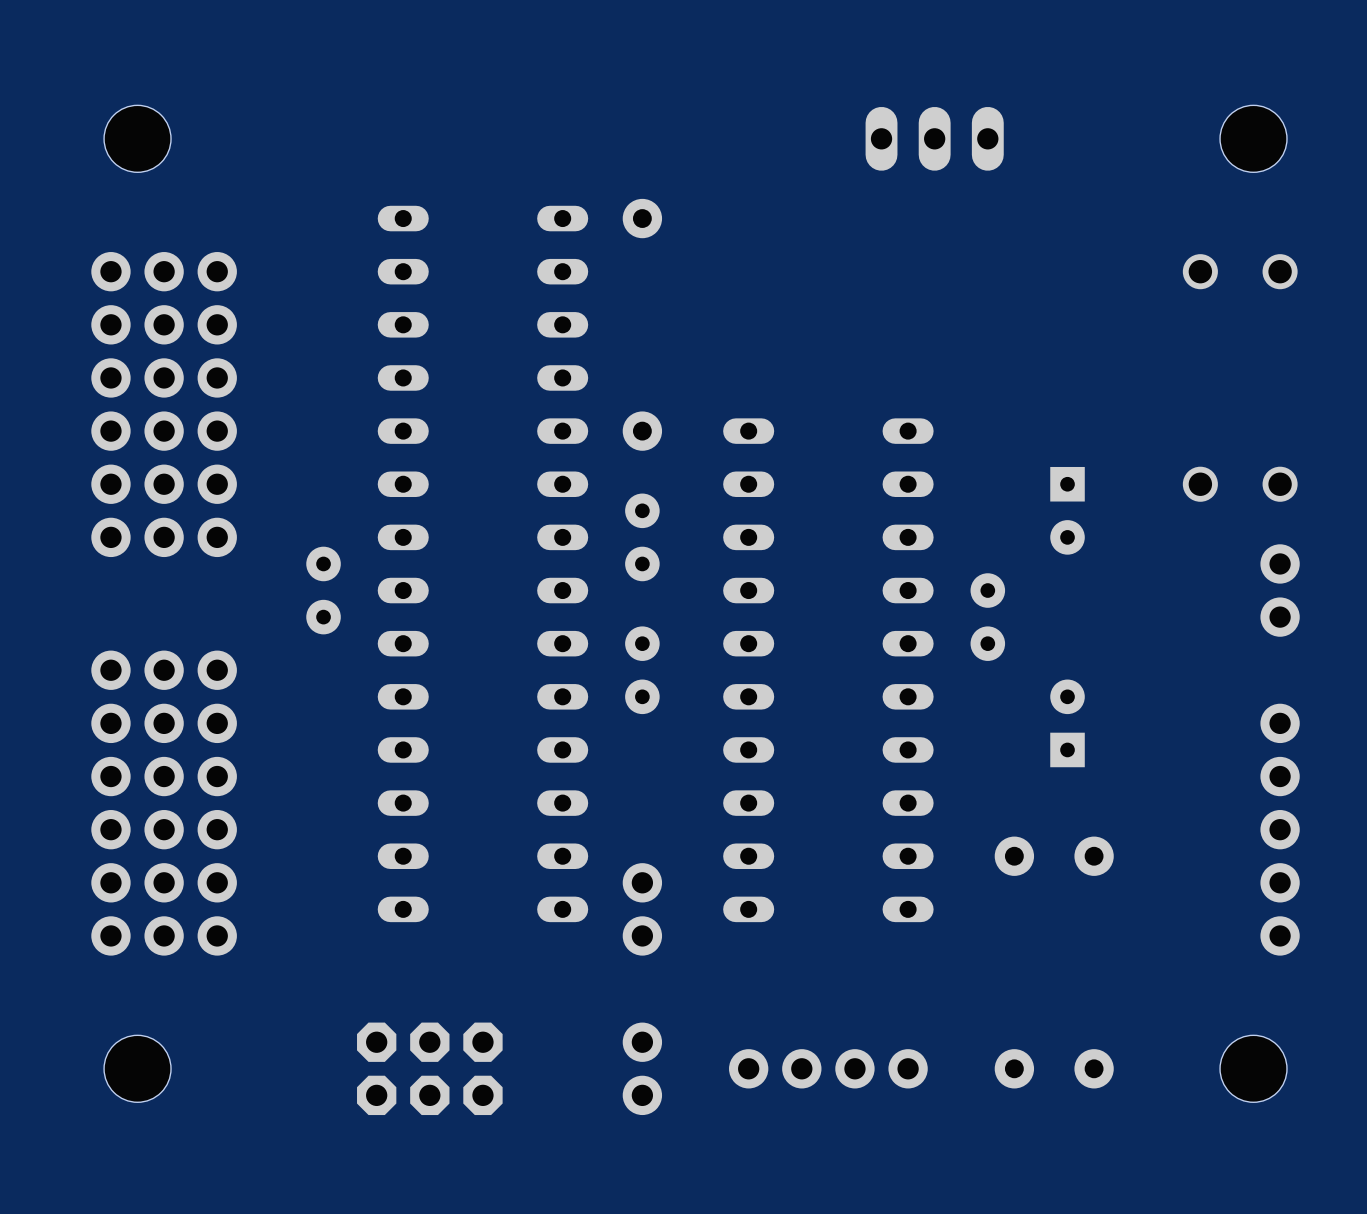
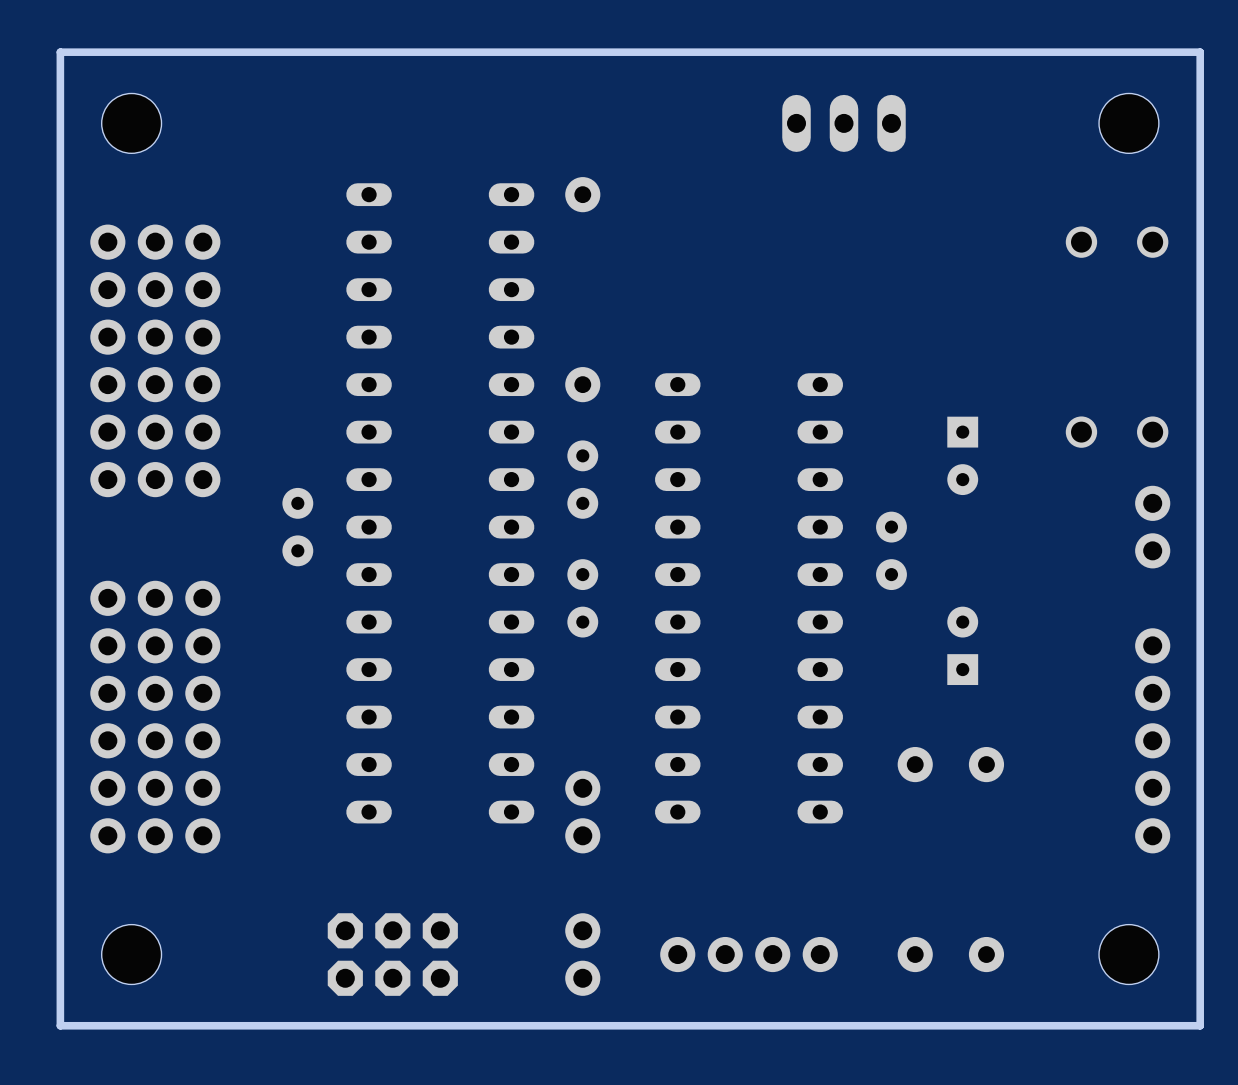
board edge: none -> (1200, 52) (60, 52) (60, 1025) (1200, 1025) (1200, 52)

